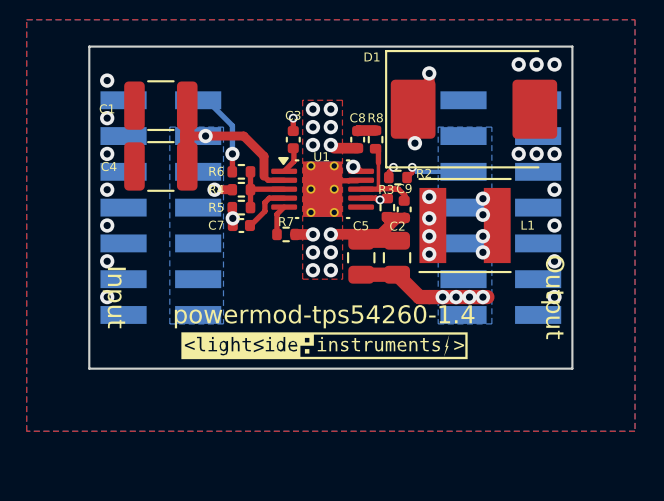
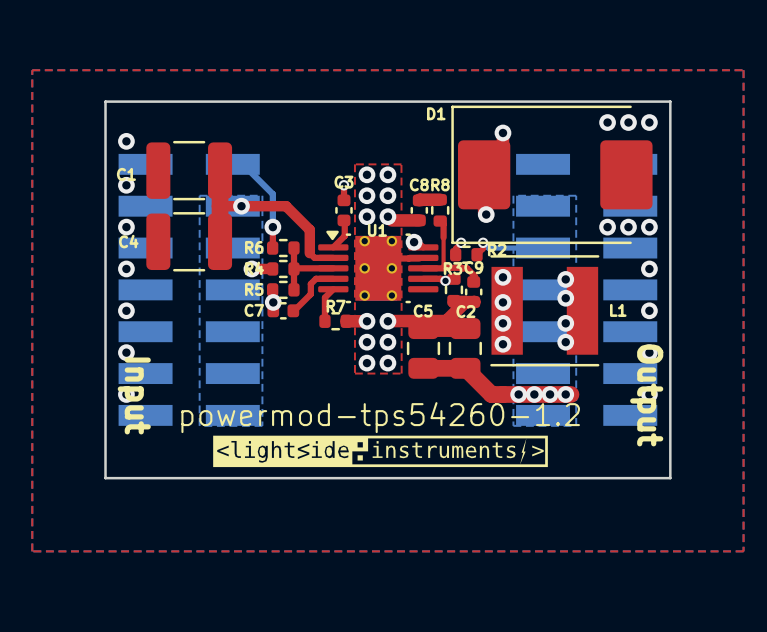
text: powermod-tps54260-1.4 (324, 316) -> powermod-tps54260-1.2 (380, 417)

